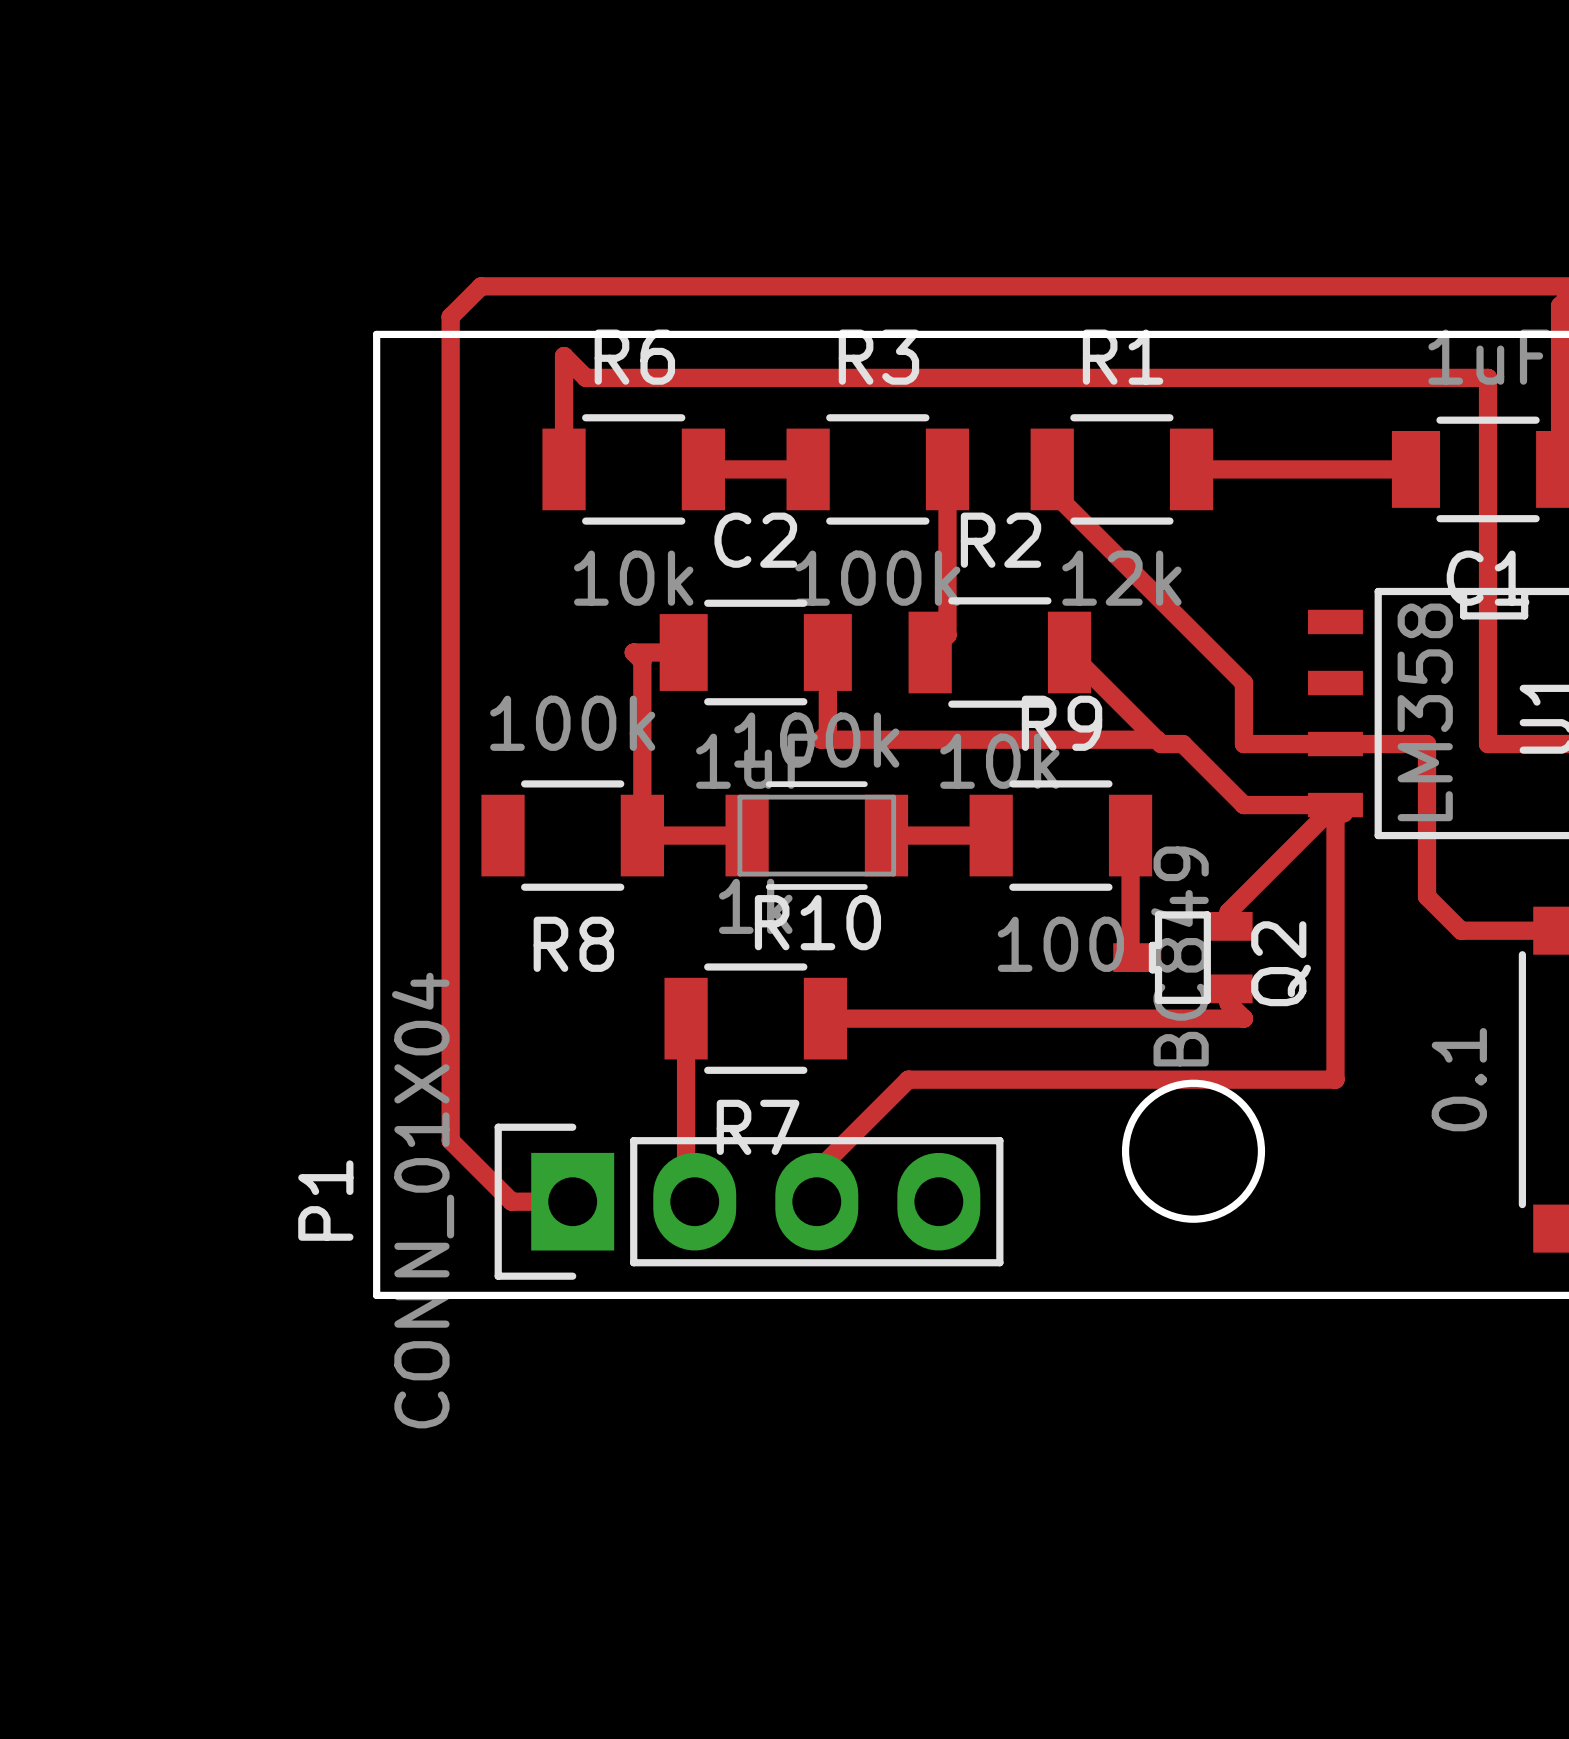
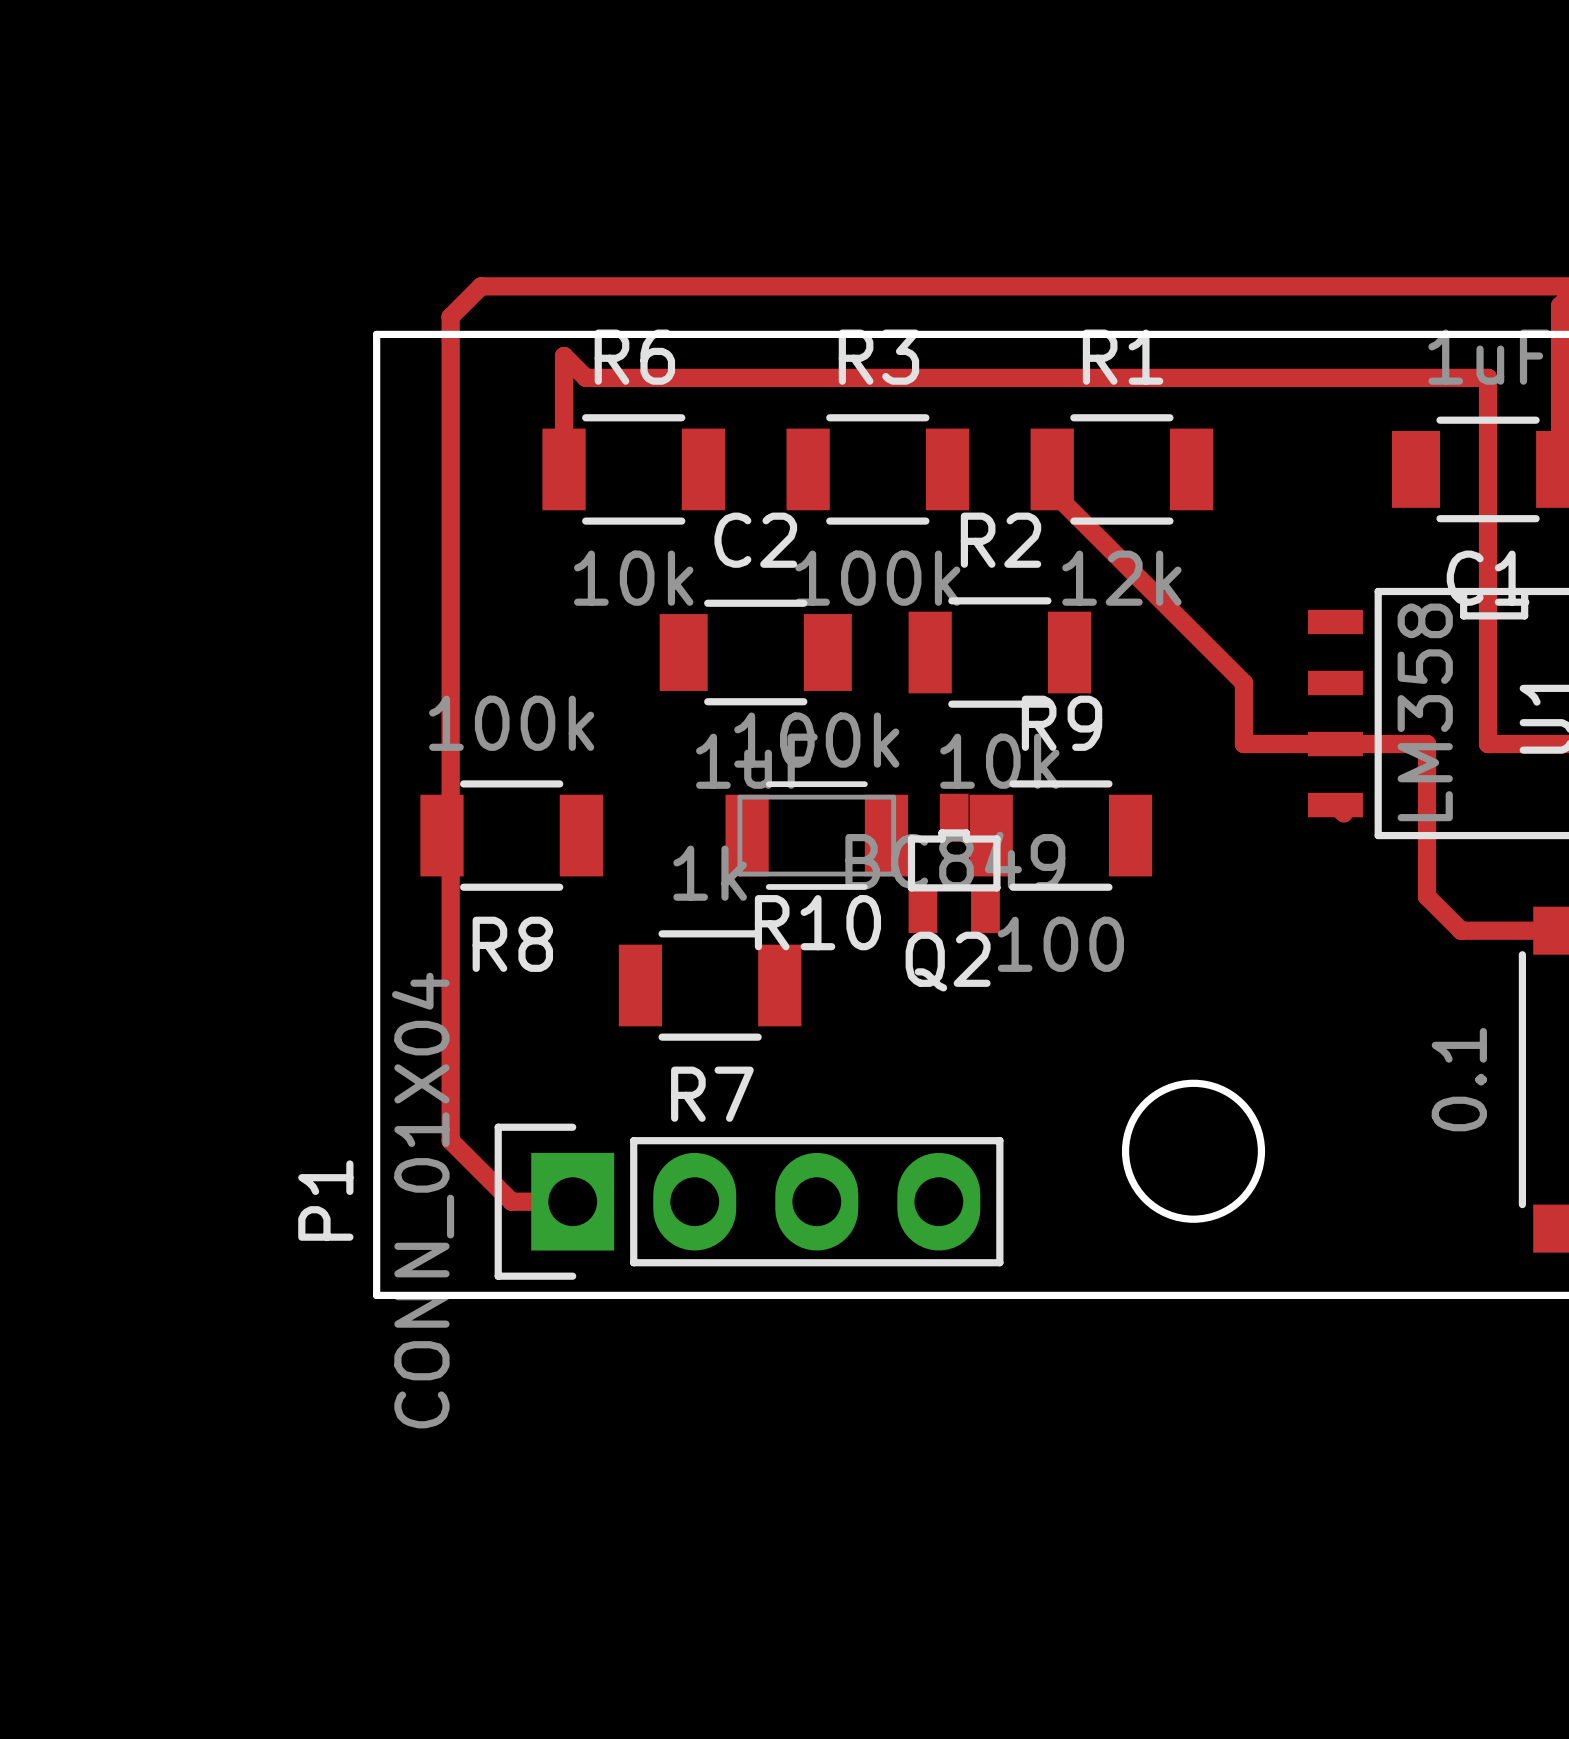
top track: (703, 469) (808, 469) -> none
top track: (947, 469) (947, 635) (930, 652) -> none
top track: (1191, 469) (1415, 469) -> none
top track: (683, 652) (633, 652) (642, 661) (642, 835) (747, 835) -> none
top track: (827, 652) (827, 732) (821, 739) (1156, 739) -> none
top track: (1069, 652) (1161, 744) (1182, 744) (1243, 805) (1335, 805) -> none
top track: (1335, 805) (1335, 1079) (908, 1079) (816, 1171) (816, 1201) -> none
top track: (1335, 805) (1228, 911) (1228, 926) -> none
R8 position: (572, 835) -> (511, 835)
top track: (886, 835) (991, 835) -> none
top track: (1130, 835) (1130, 950) (1137, 957) -> none
Q2 rotation: 0° (1182, 957) -> 90° clockwise (954, 863)
Q2 position: (1182, 957) -> (954, 863)
top track: (1228, 988) (1228, 1003) (1243, 1018) (825, 1018) -> none
top track: (686, 1018) (686, 1193) (694, 1201) -> none
R7 position: (755, 1018) -> (710, 985)

